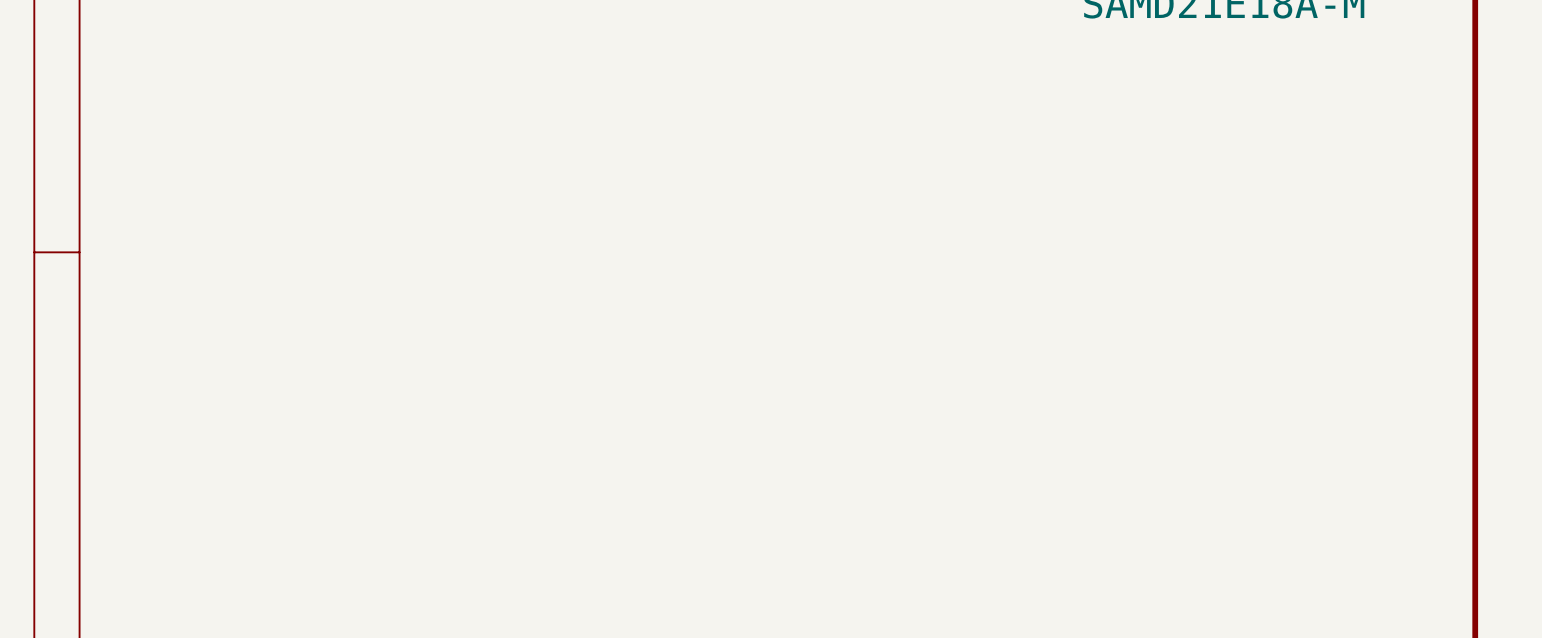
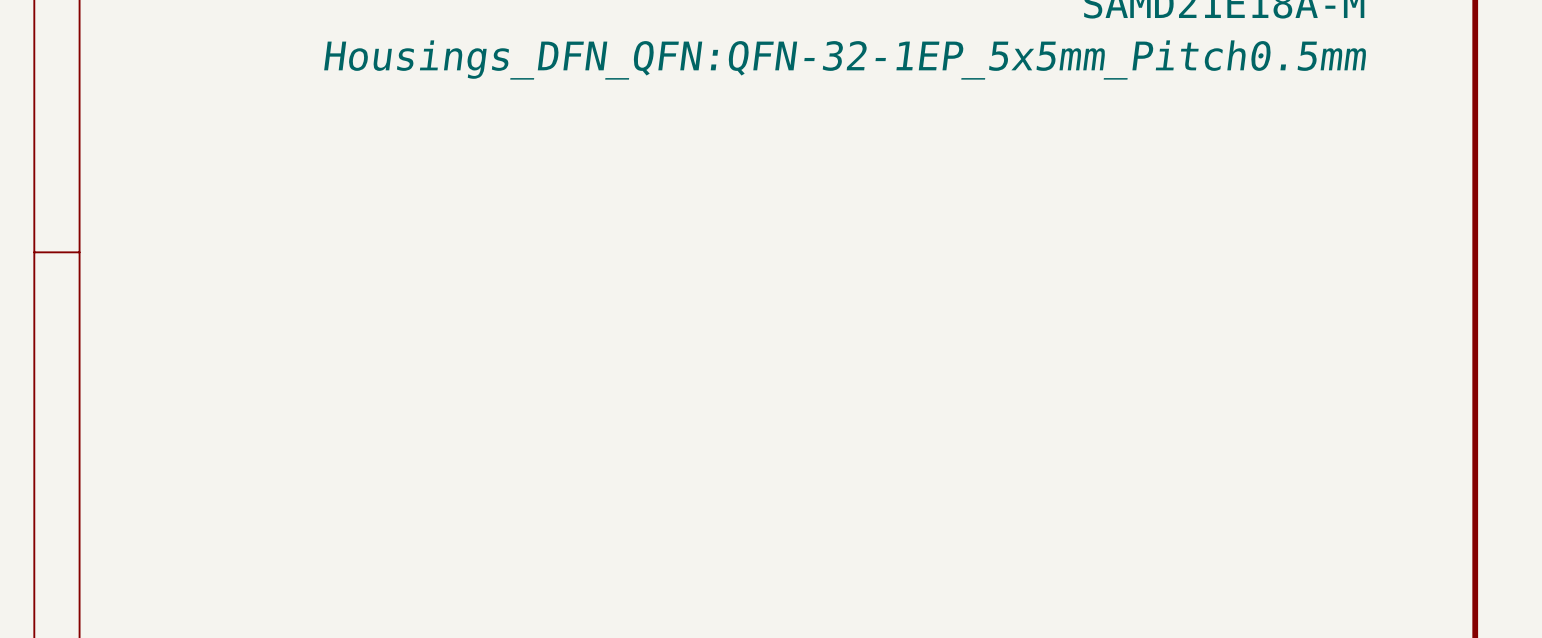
part text: none -> Housings_DFN_QFN:QFN-32-1EP_5x5mm_Pitch0.5mm (845, 60)

